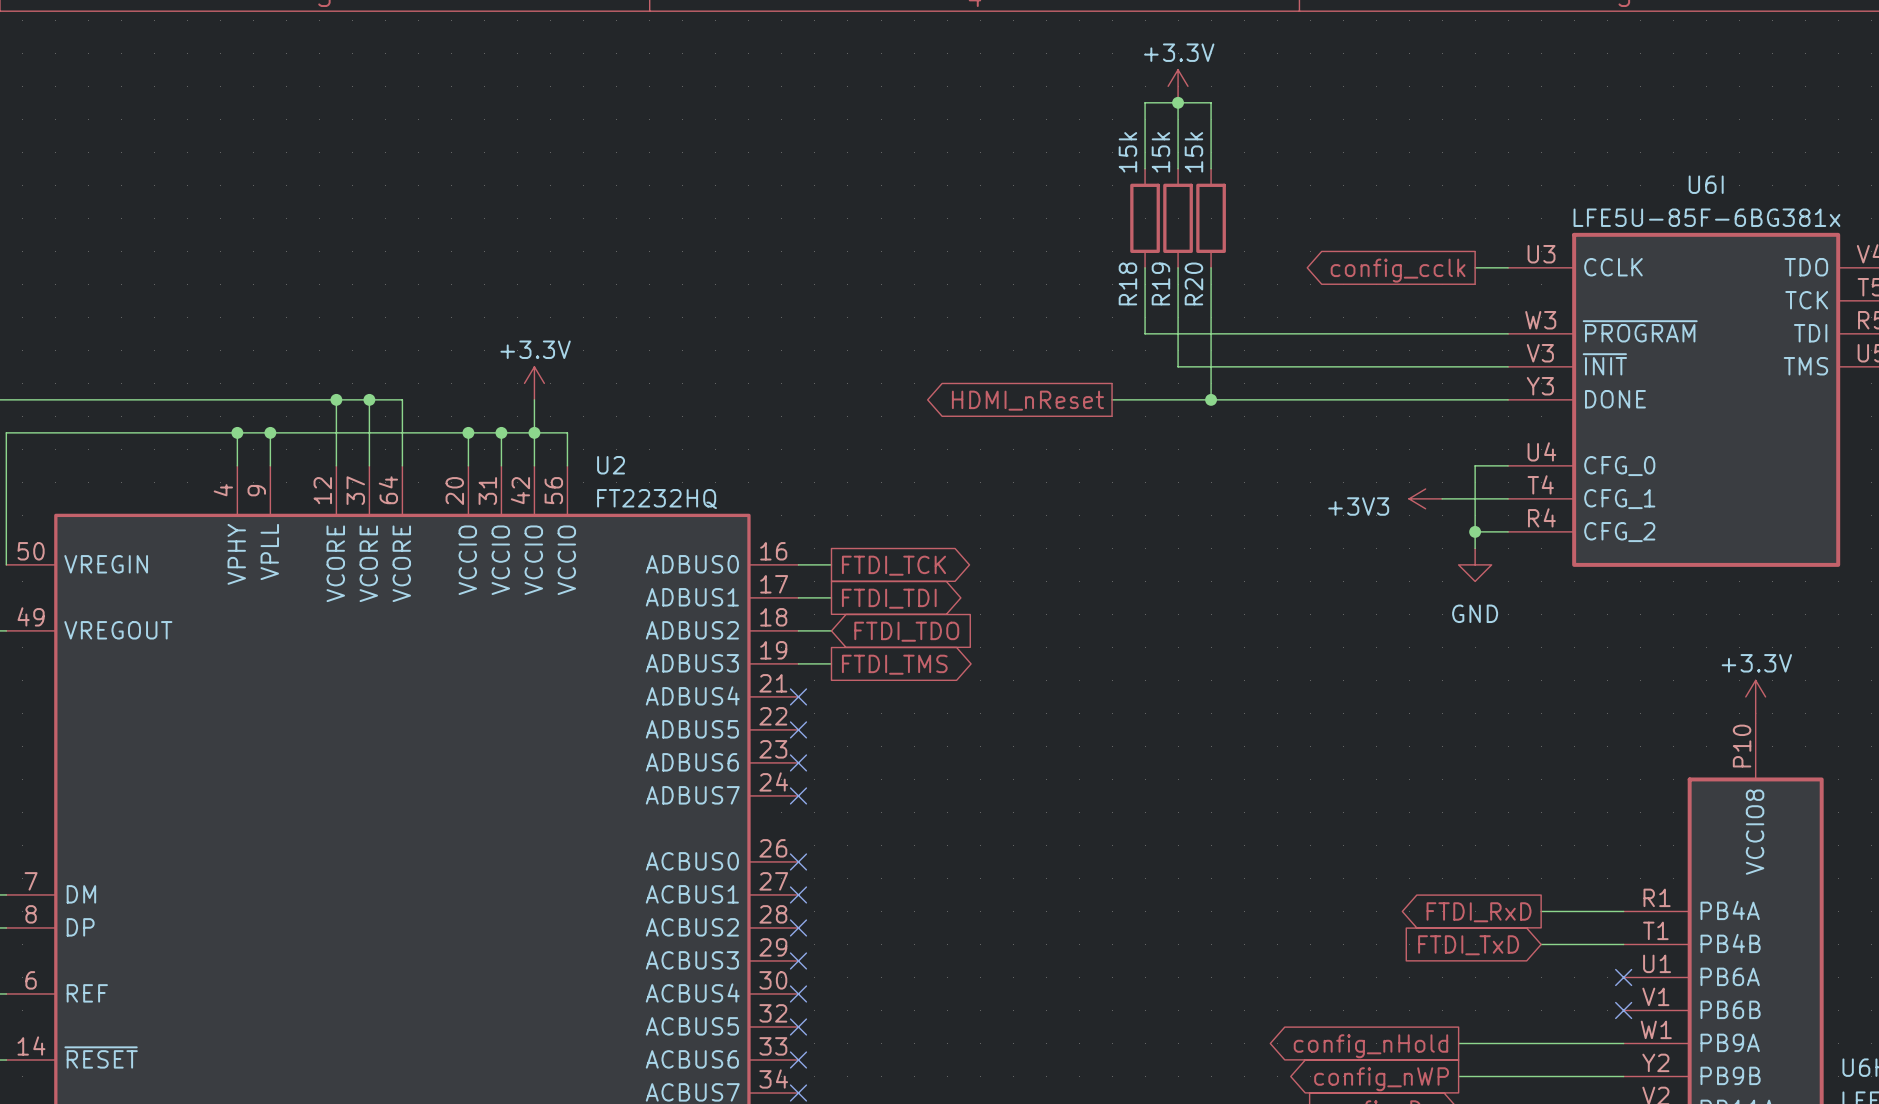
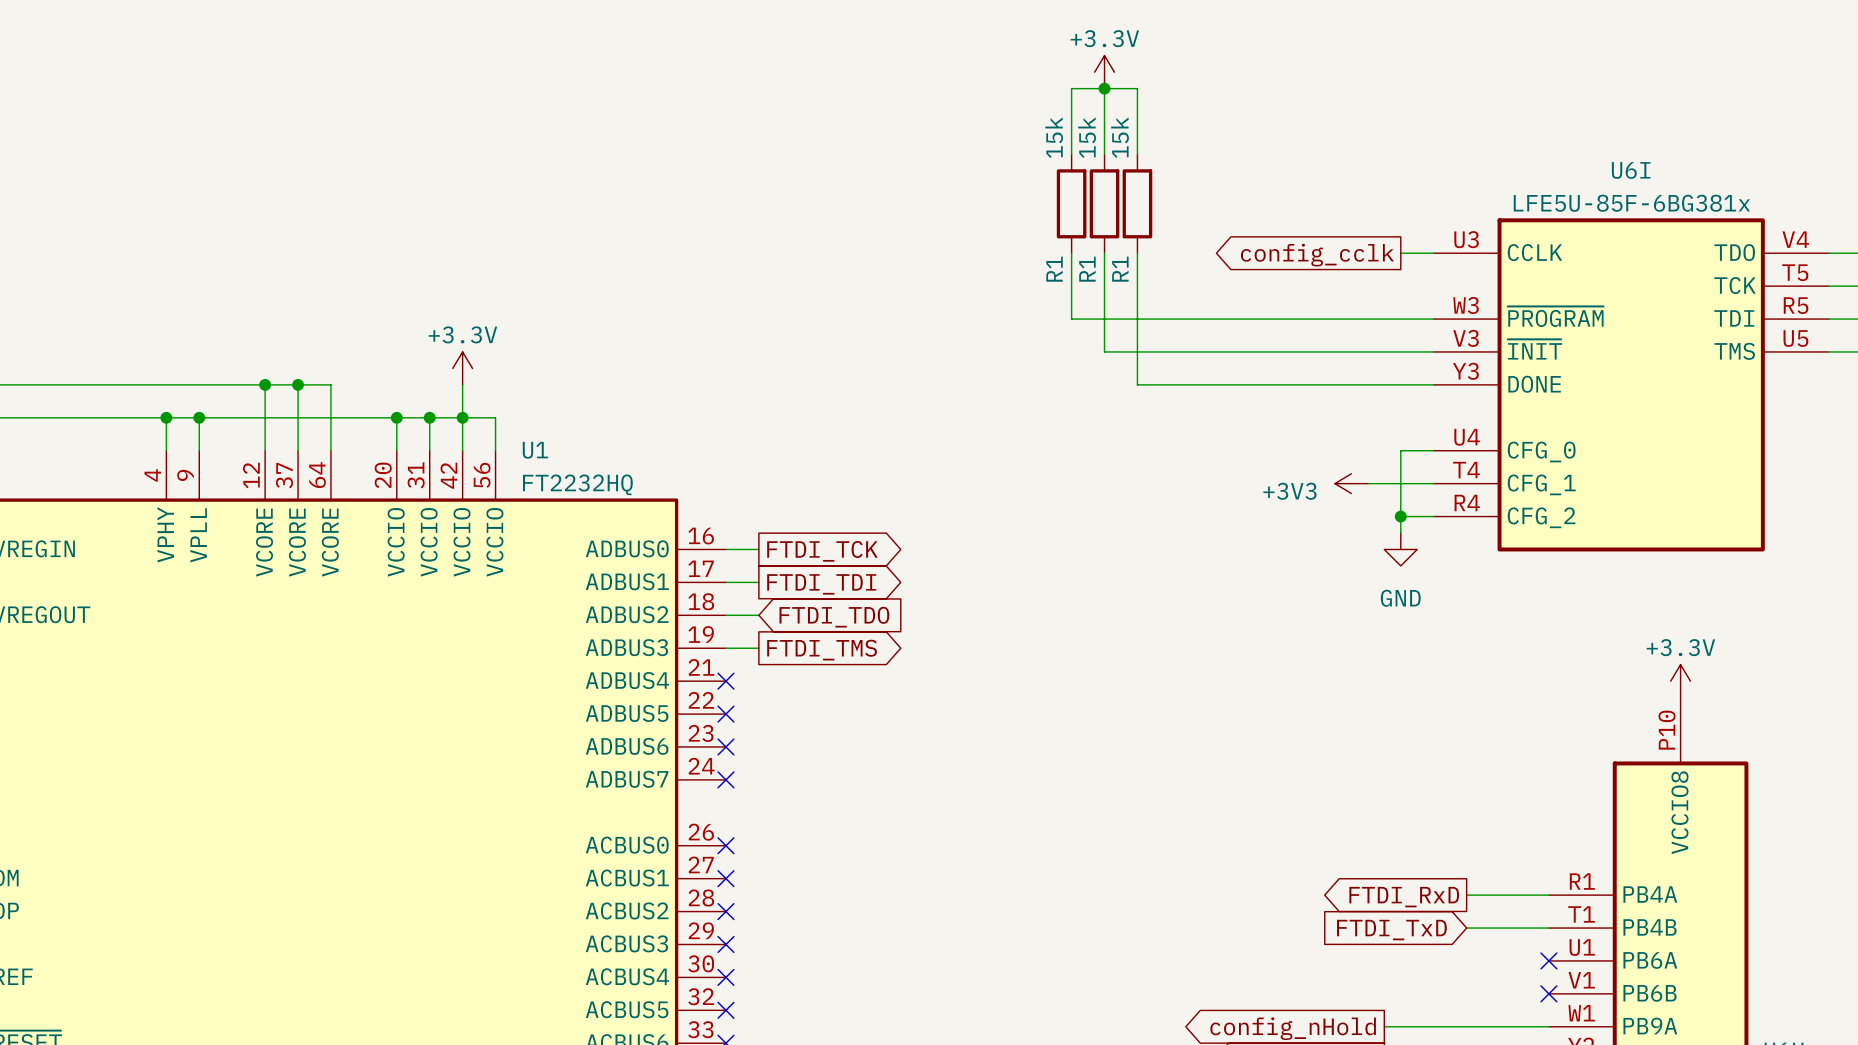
R18 name: R18 (1127, 283) -> R1 (1054, 269)
R19 name: R19 (1160, 283) -> R1 (1087, 269)
R20 name: R20 (1193, 283) -> R1 (1120, 269)
wire: (1112, 399) (1211, 399) -> none
junction: (1211, 399) -> none
global label: HDMI_nReset (1027, 400) -> none
U2 name: U2 (611, 465) -> U1 (535, 450)

